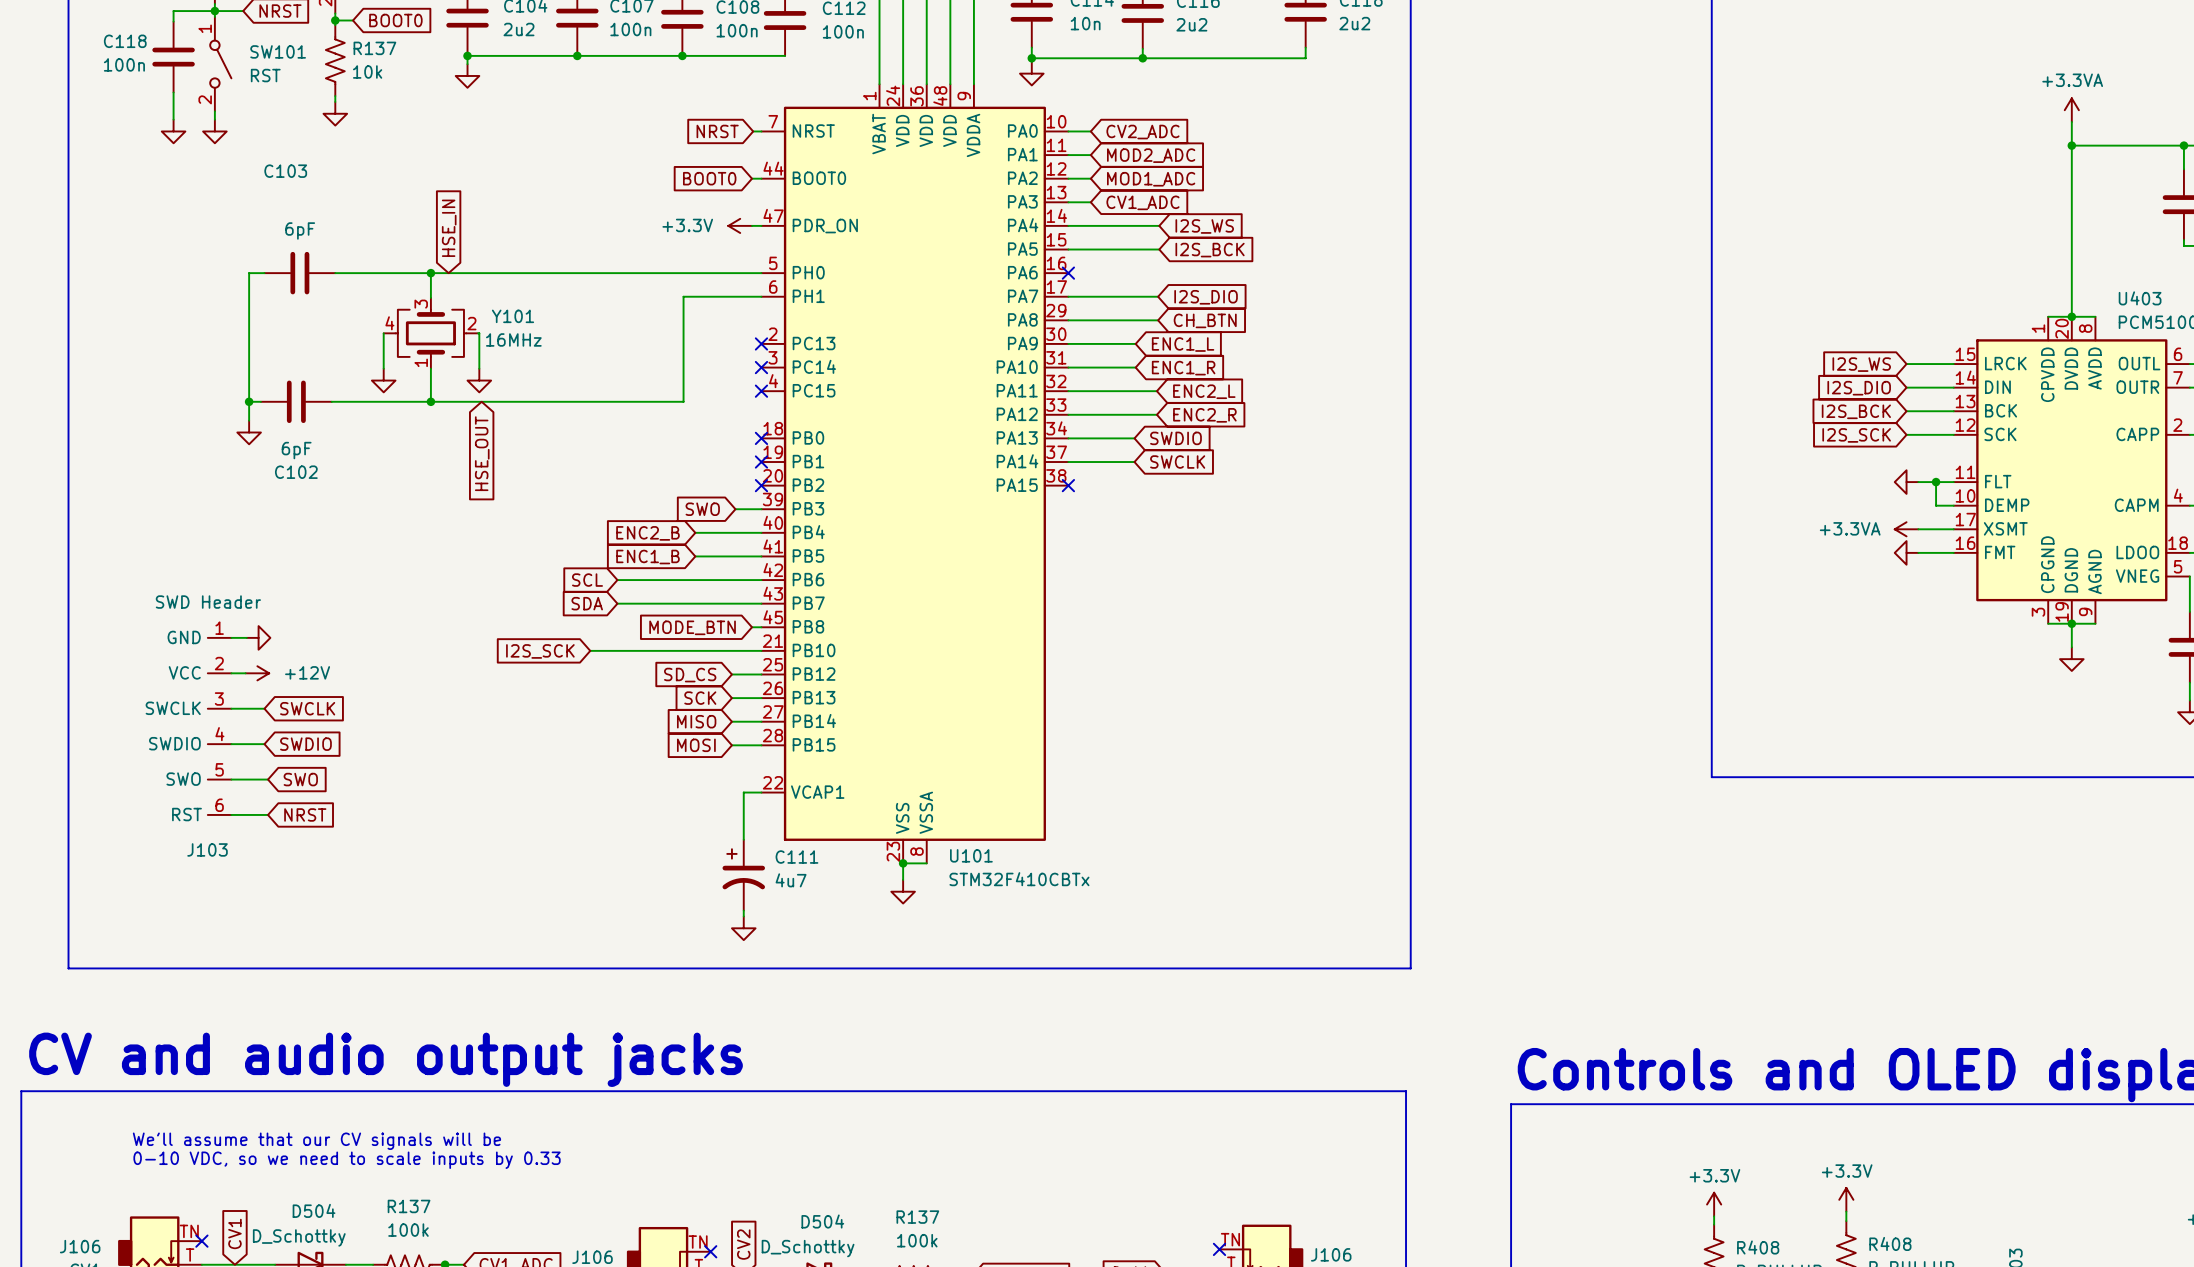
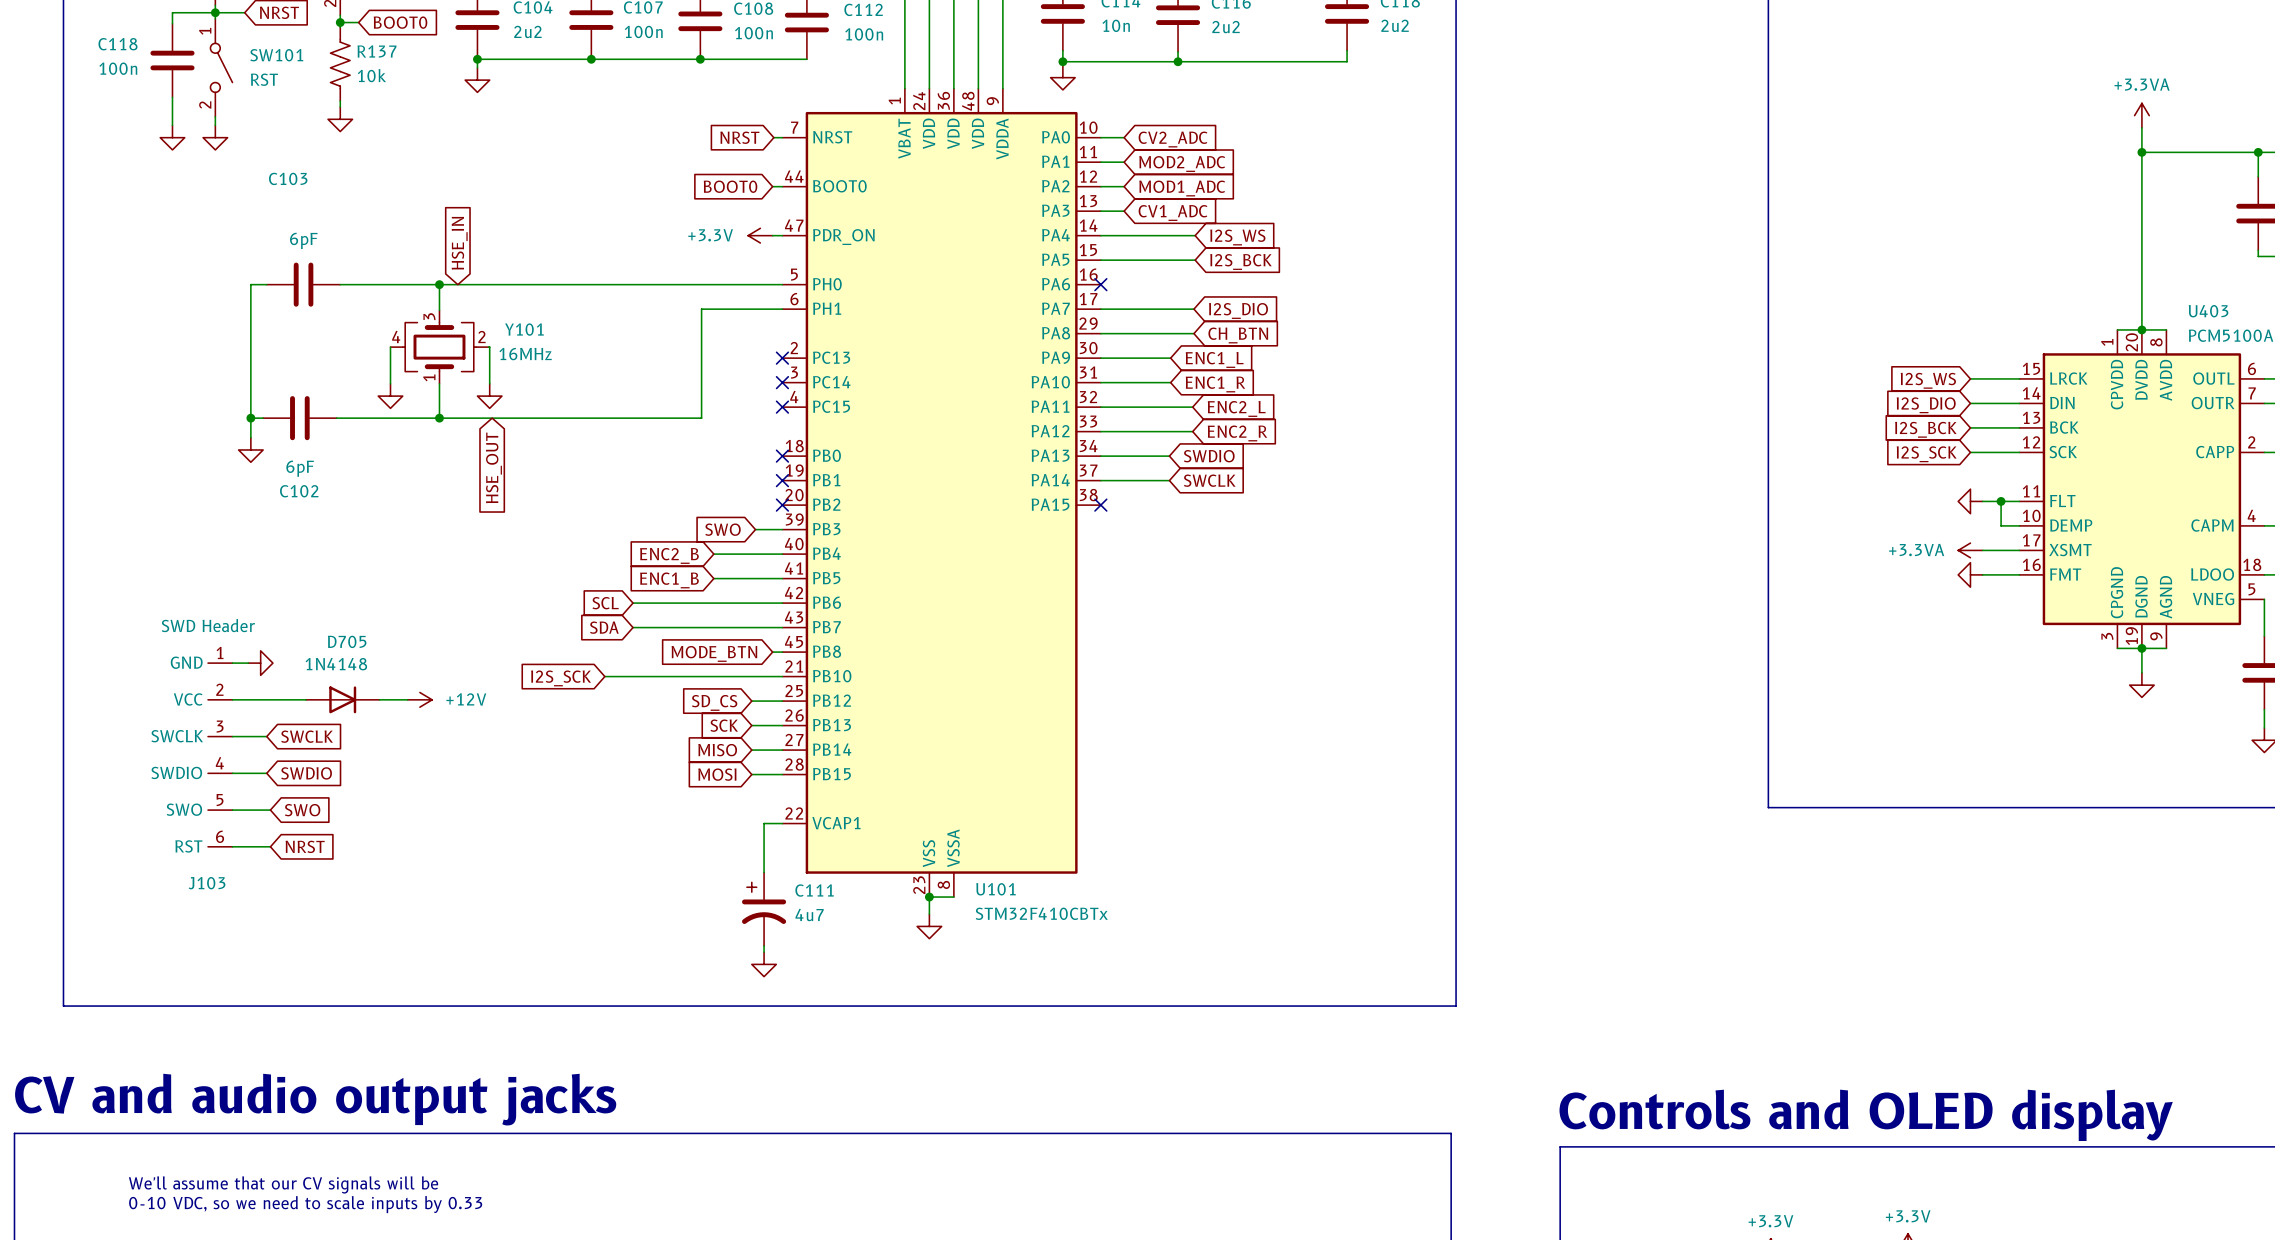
wire: none -> (247, 699) (305, 699)
power symbol position: +12V (257, 673) -> +12V (419, 699)
D705: none -> 1N4148 (342, 699)
wire: none -> (379, 699) (407, 699)

